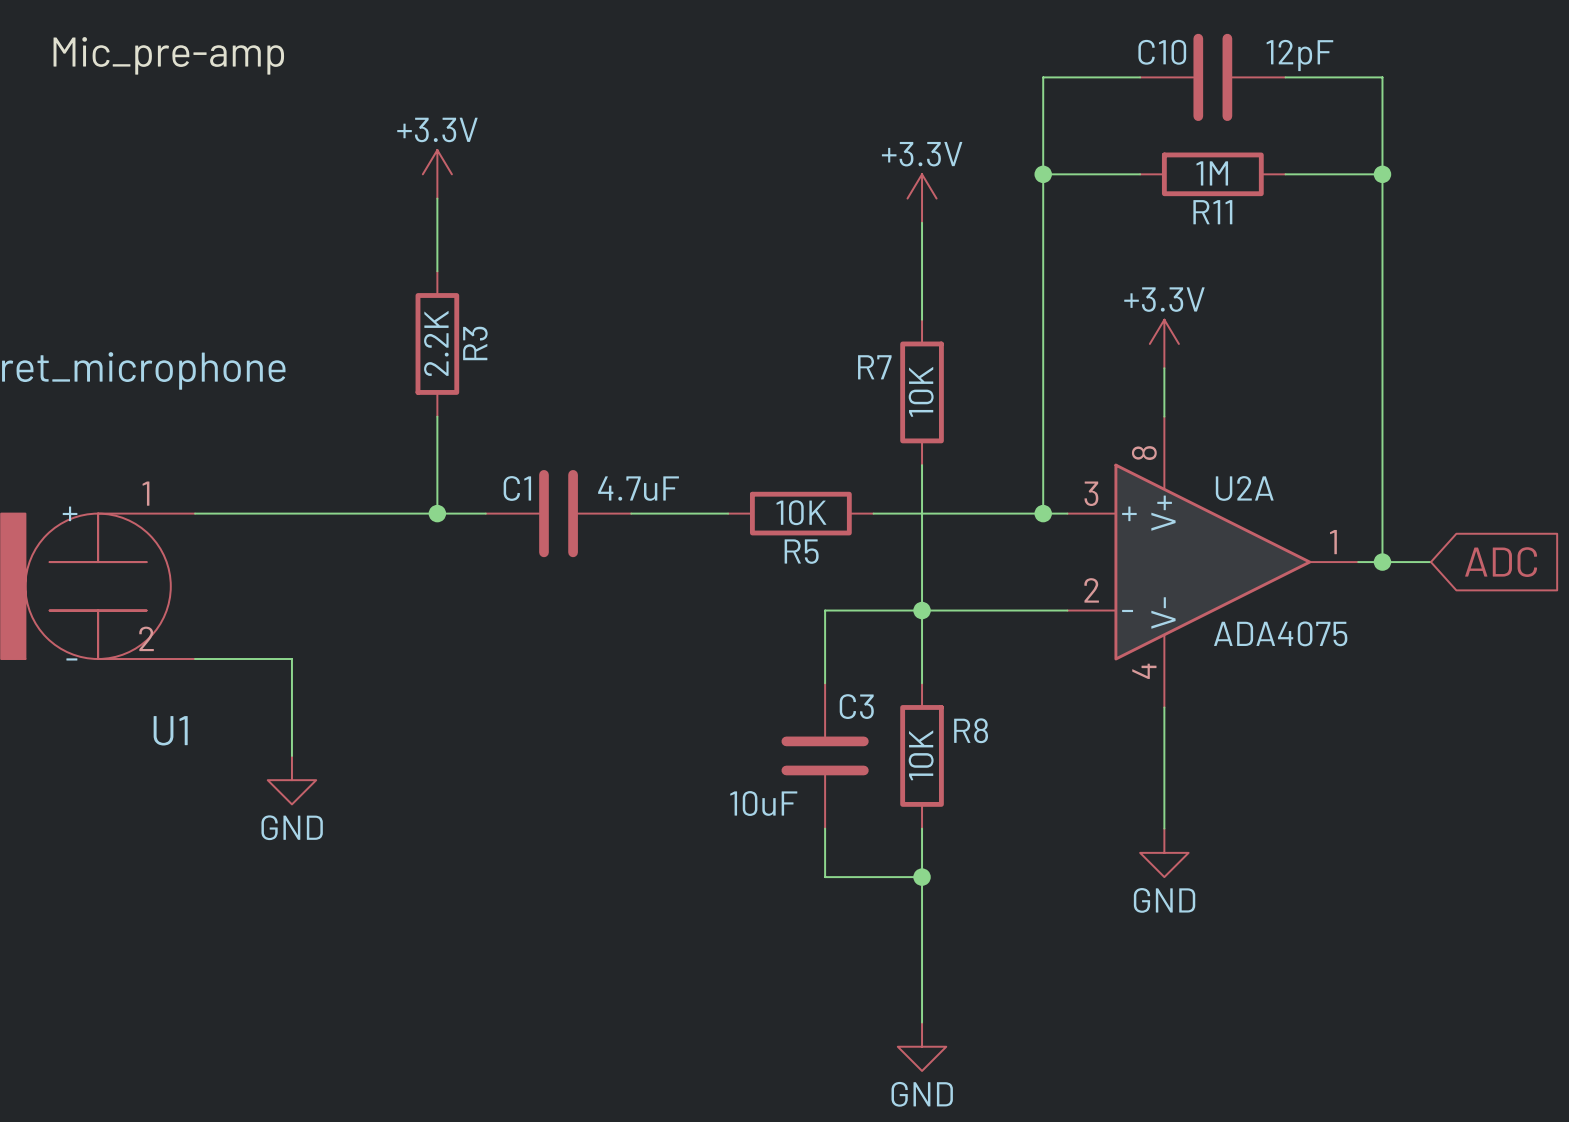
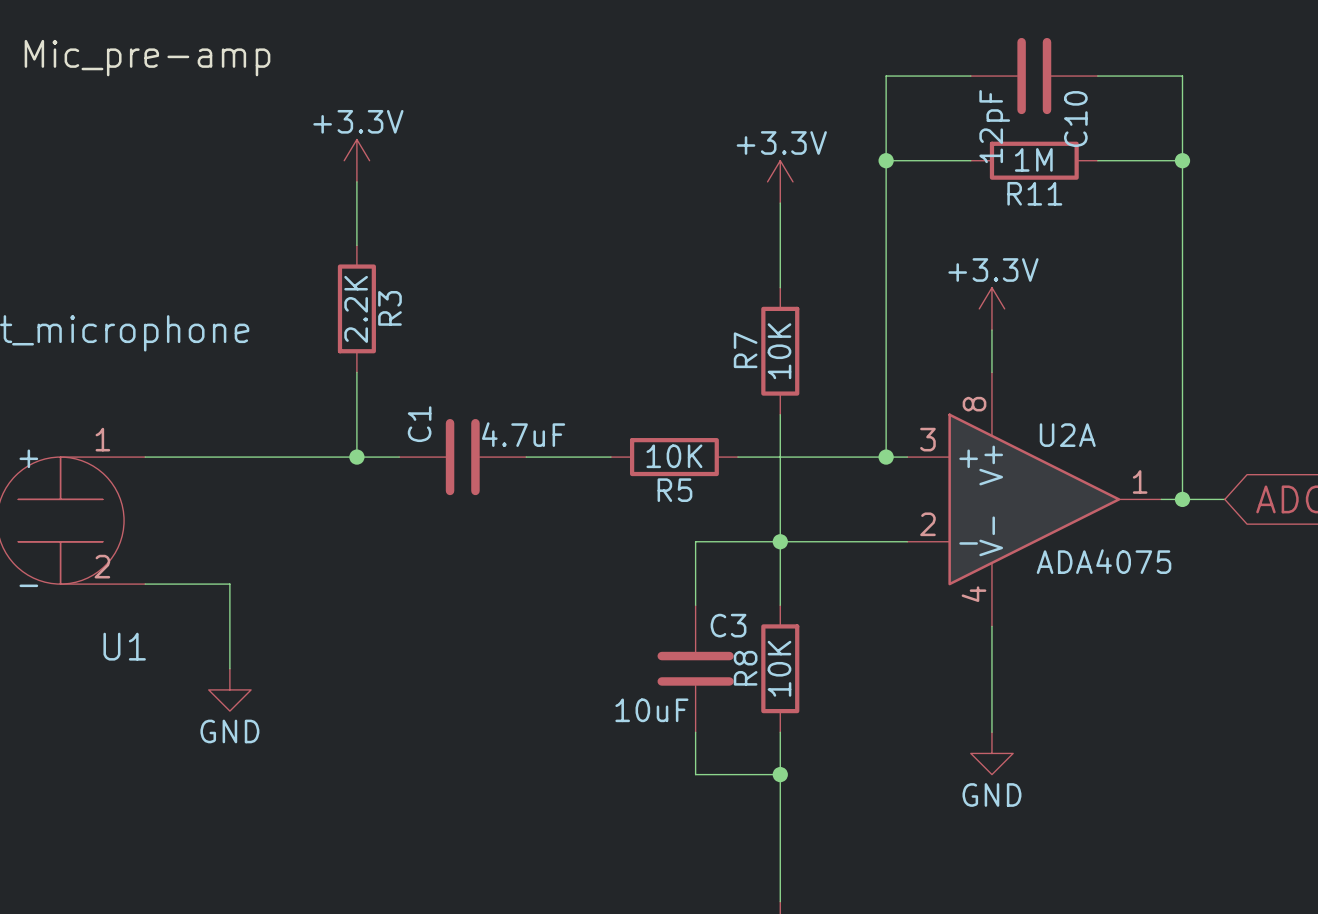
C10 name rotation: 0° (1162, 52) -> 90° counterclockwise (1075, 119)
C10 name position: C10 (1162, 52) -> C10 (1075, 119)
C10 value rotation: 0° (1299, 55) -> 90° counterclockwise (994, 126)
C10 value position: 12pF (1299, 55) -> 12pF (994, 126)
R7 name rotation: 0° (874, 367) -> 90° counterclockwise (745, 350)
C1 name rotation: 0° (517, 488) -> 90° counterclockwise (419, 424)
R8 name rotation: 0° (971, 730) -> 90° counterclockwise (745, 668)
R8 name position: R8 (971, 730) -> R8 (745, 668)

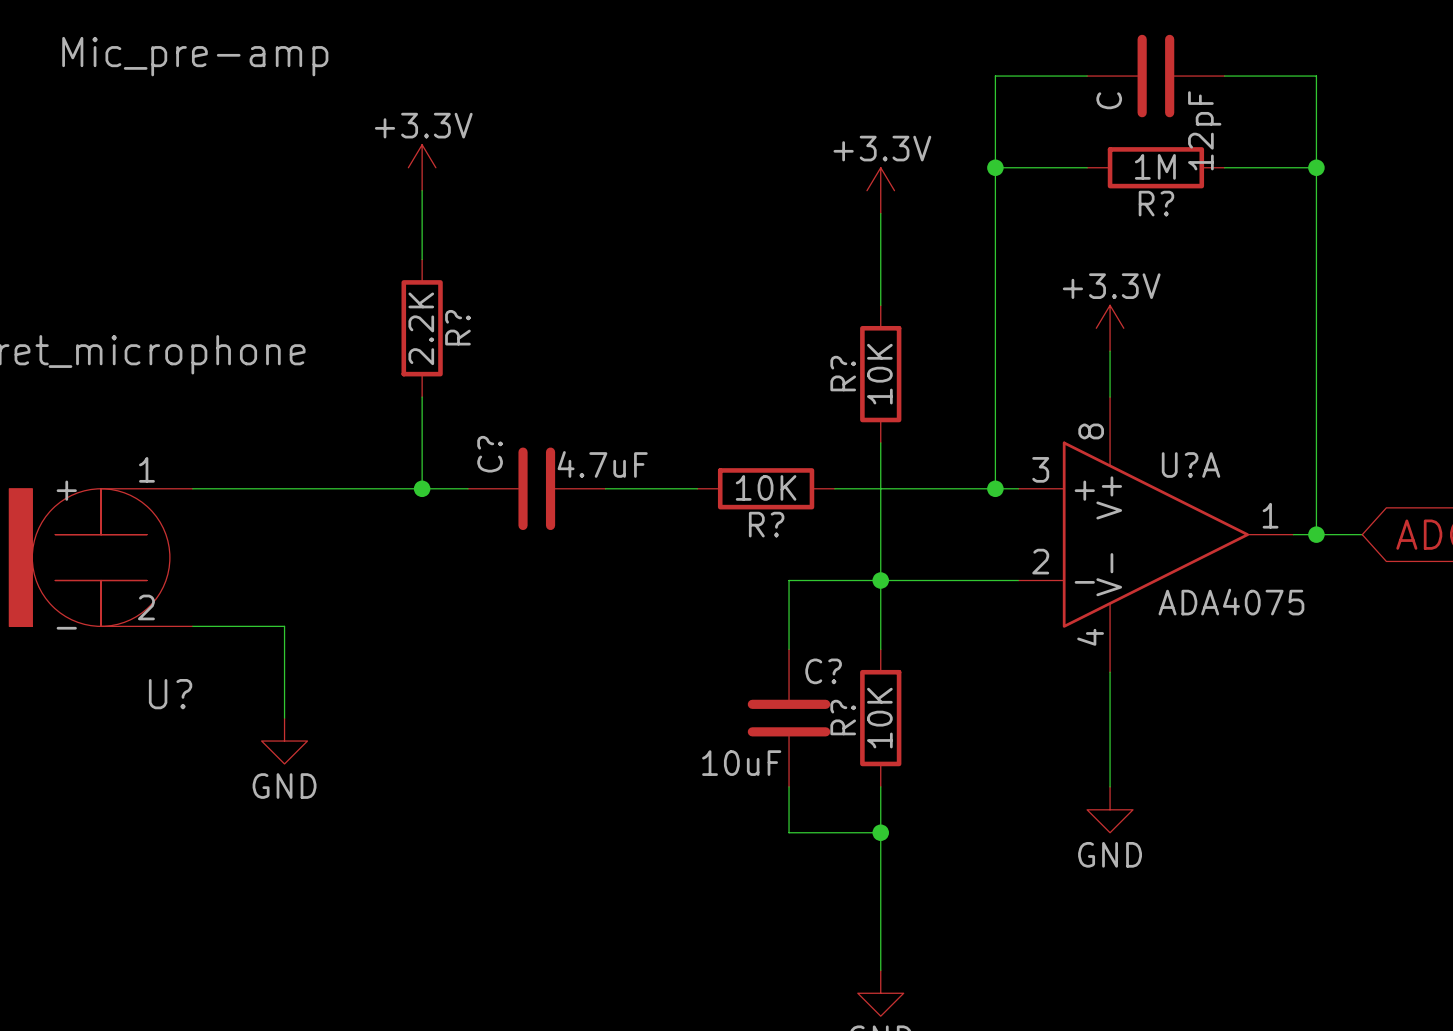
C10 name: C10 (1075, 119) -> 12pF (1204, 130)
C10 value: 12pF (994, 126) -> C (1109, 100)
R11 name: R11 (1034, 193) -> R? (1156, 203)
R3 name: R3 (389, 308) -> R? (457, 327)
R7 name: R7 (745, 350) -> R? (843, 373)
C1 name: C1 (419, 424) -> C? (490, 454)
U2A name: U2A (1067, 435) -> U?A (1191, 465)
R5 name: R5 (674, 490) -> R? (766, 524)
C3 name: C3 (728, 625) -> C? (823, 671)
U1 name: U1 (124, 646) -> U? (170, 694)
R8 name: R8 (745, 668) -> R? (843, 717)

